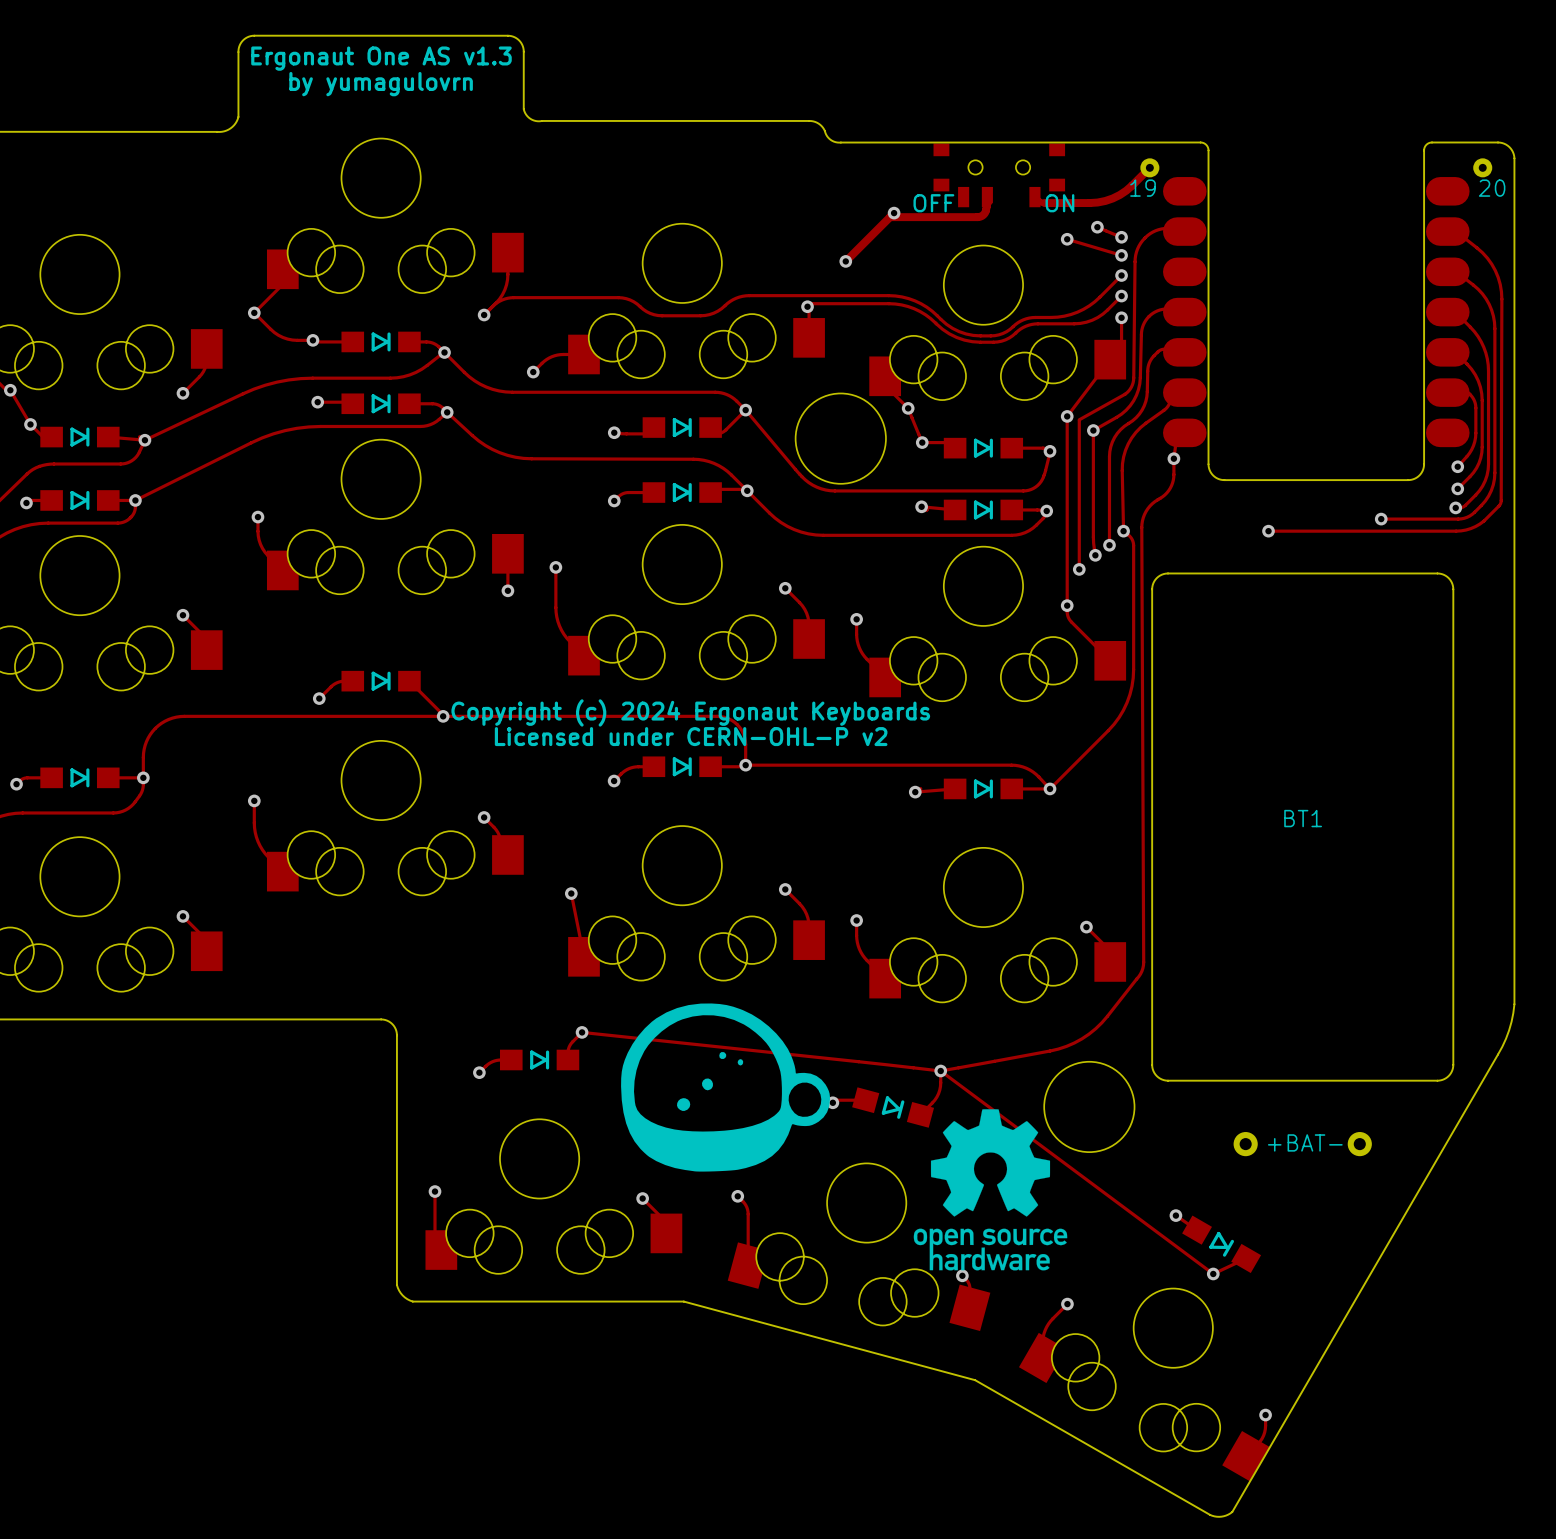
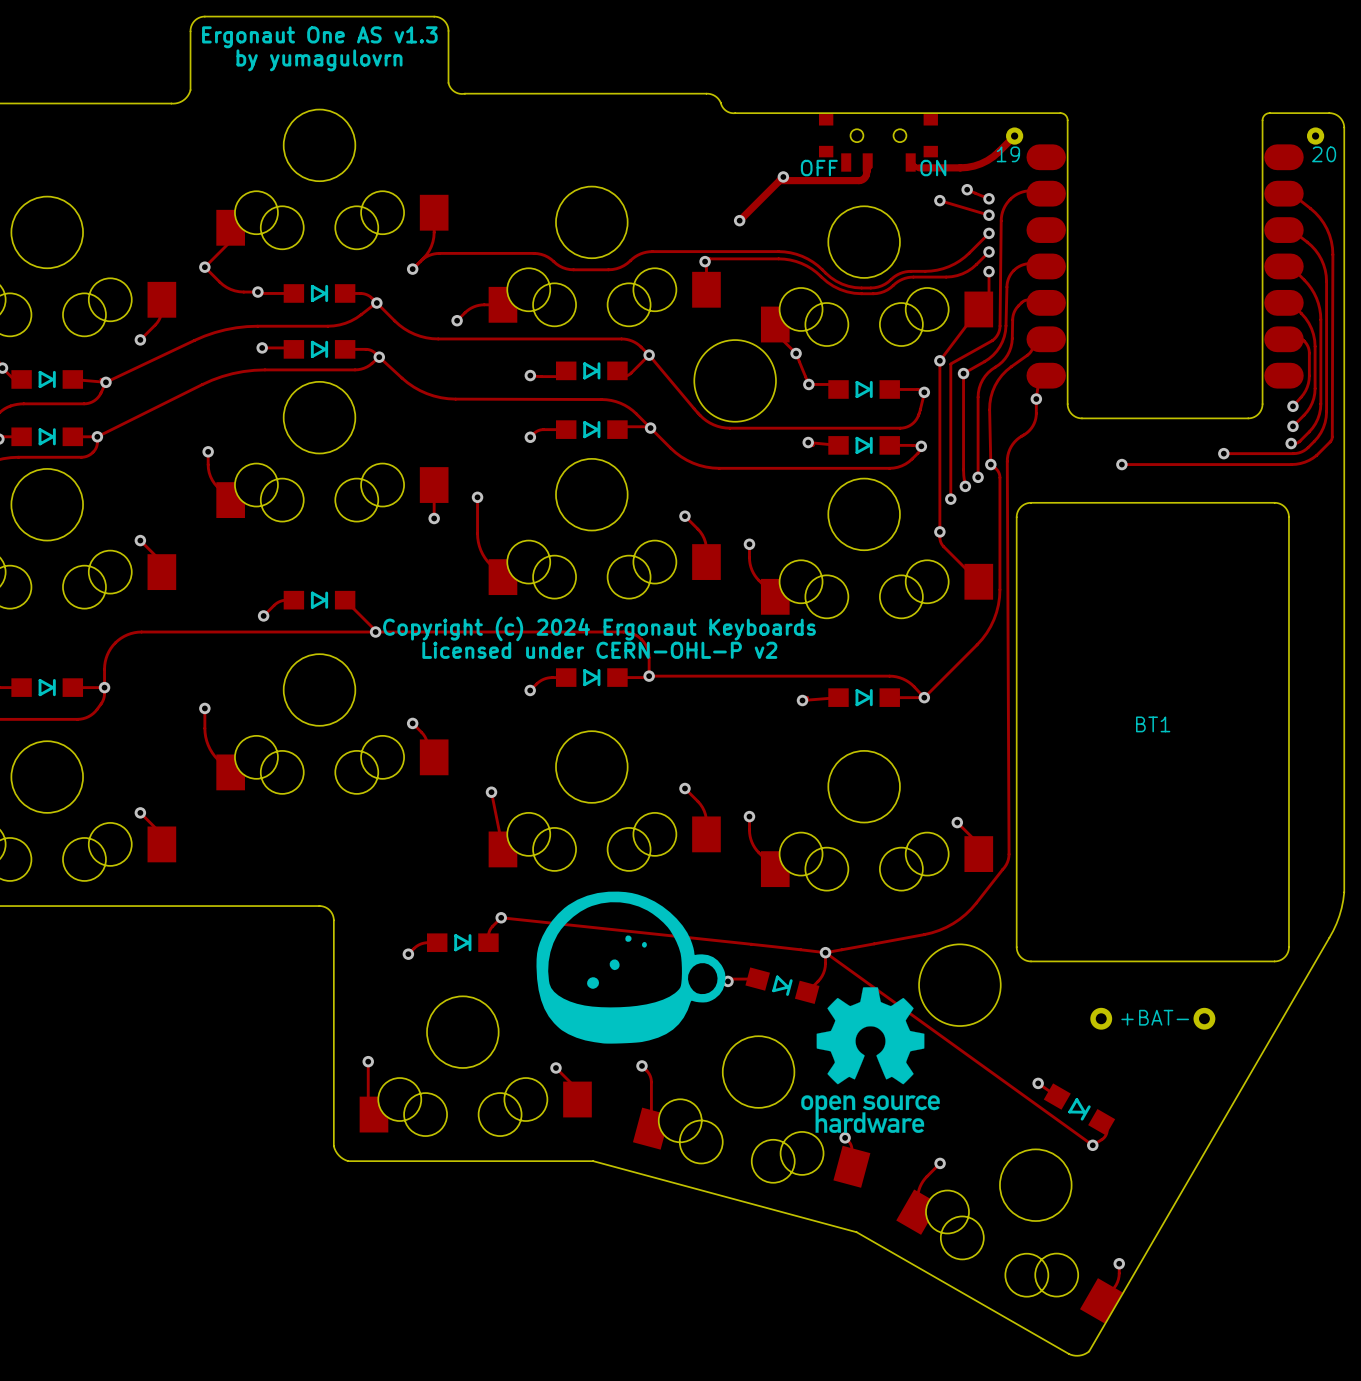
track: (940, 1071) (1213, 1273) (1246, 1258) -> (825, 952) (1092, 1145) (1104, 1137) (1107, 1129)
via position: (1213, 1273) -> (1092, 1145)

